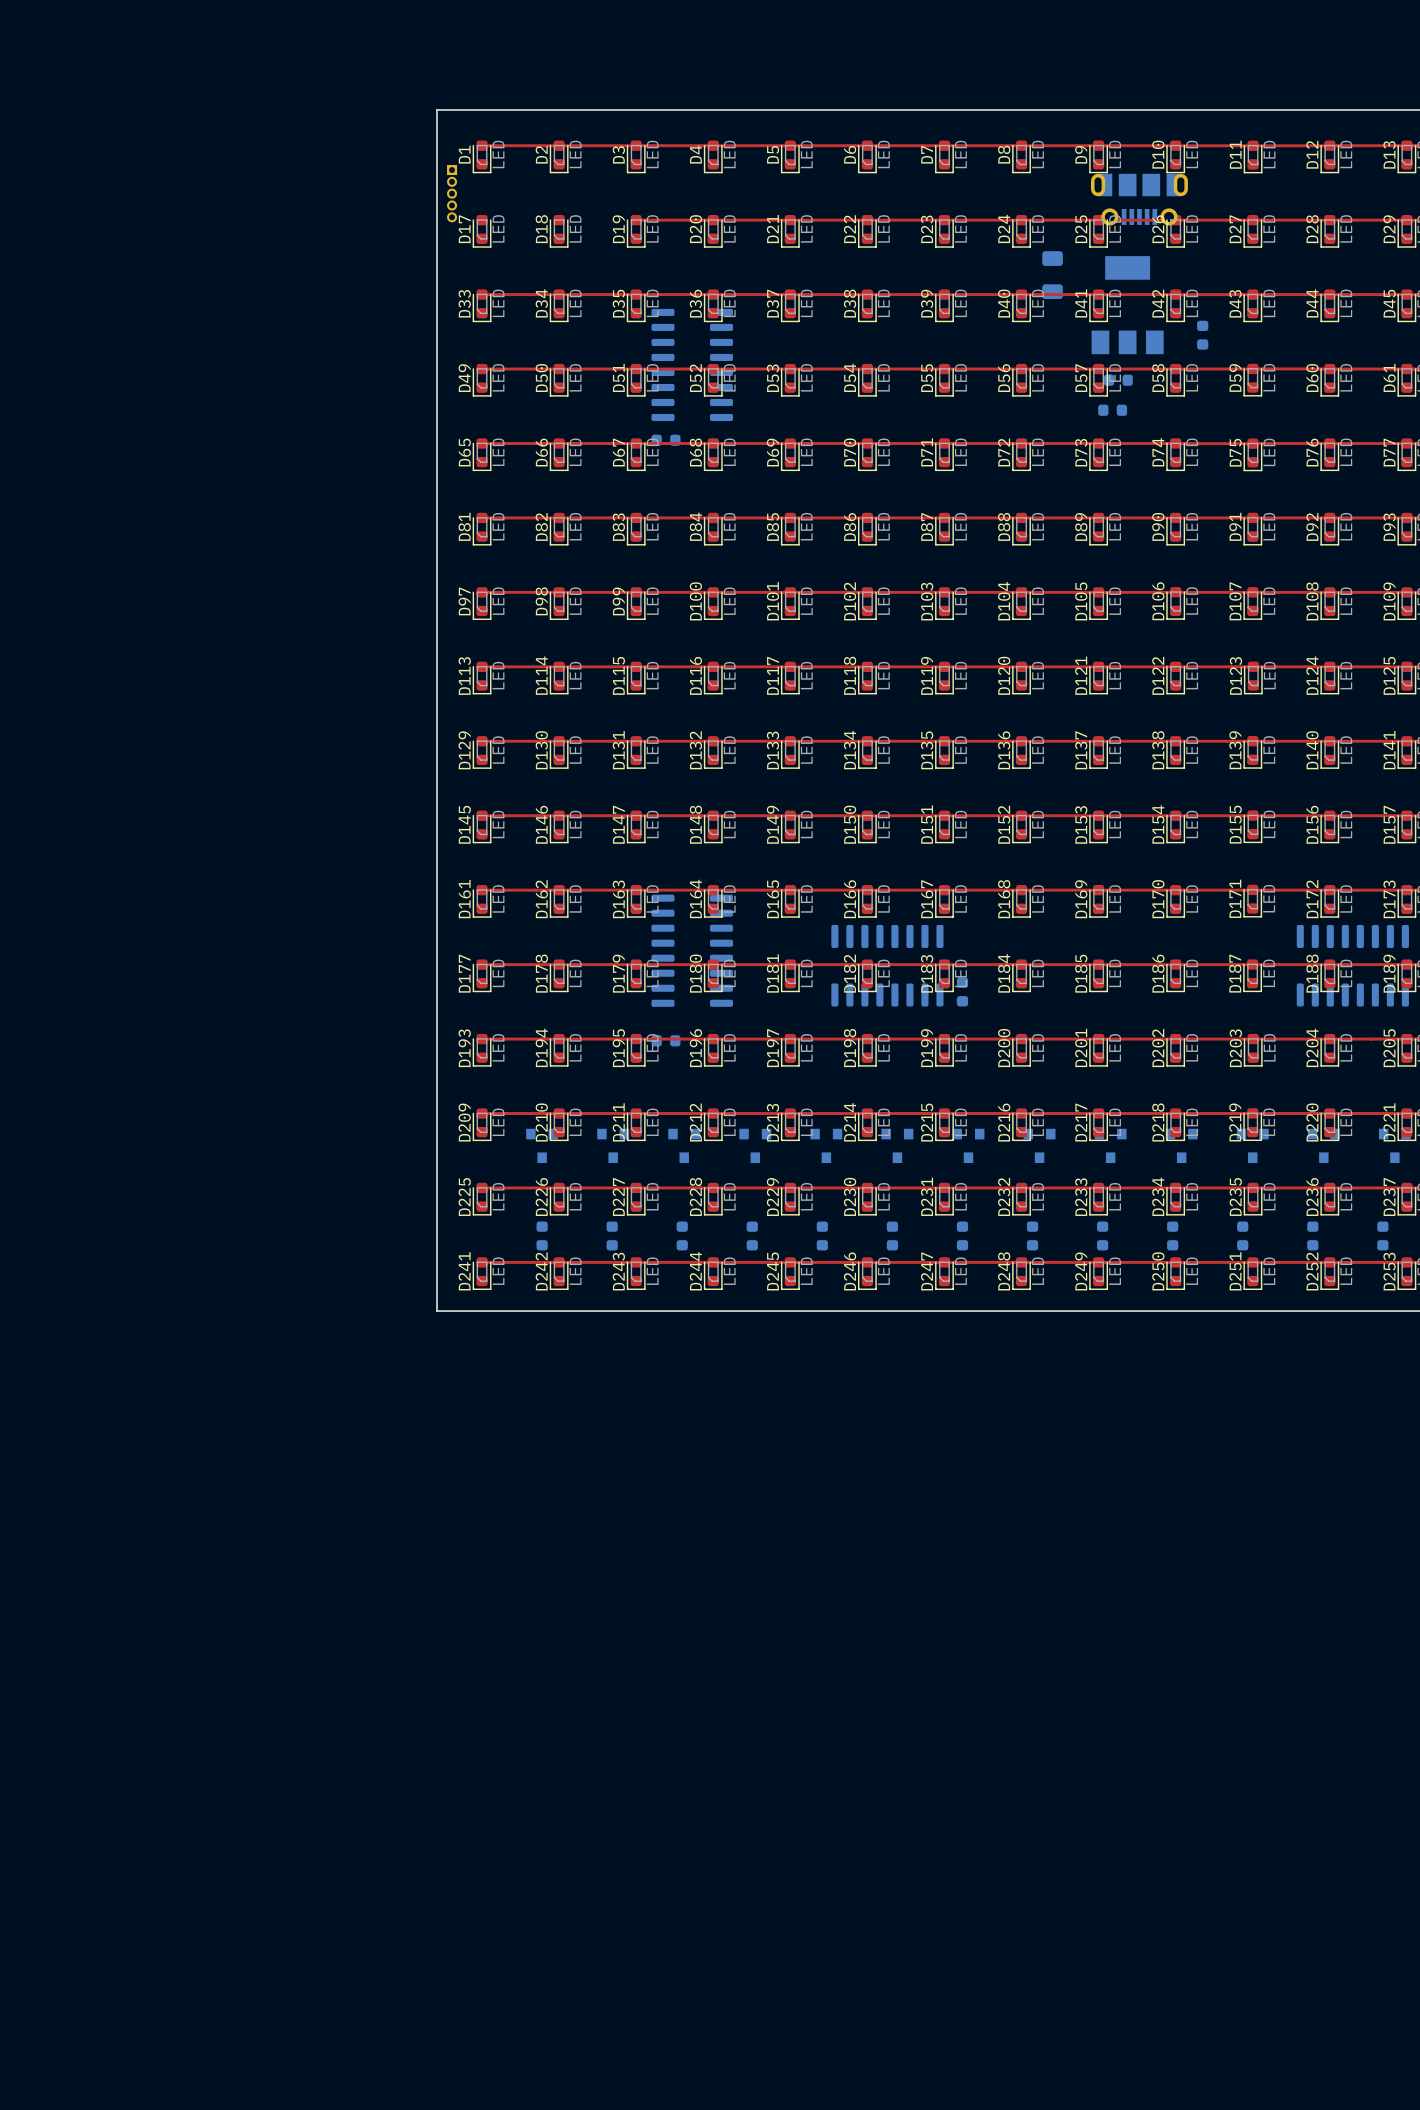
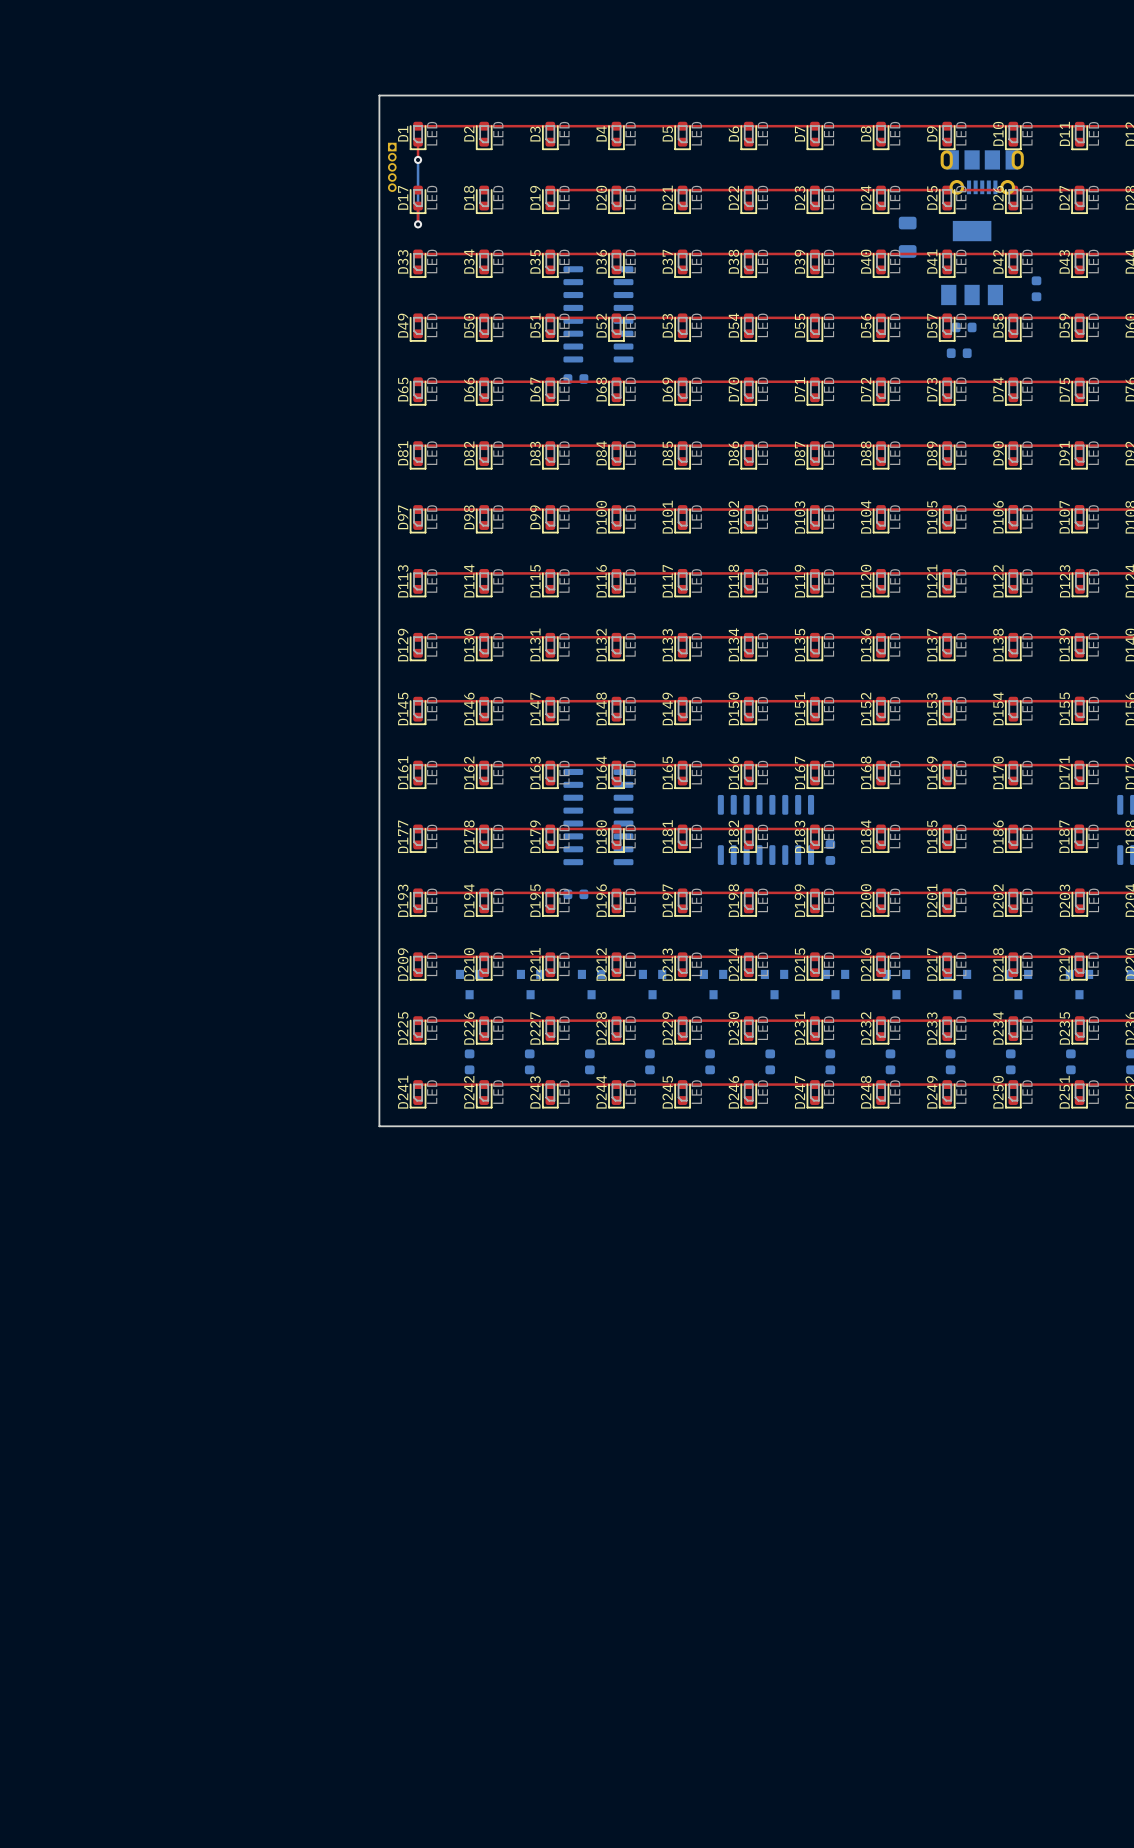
top track: none -> (418, 142) (418, 159)
bottom track: none -> (418, 159) (418, 224)
via: none -> (418, 159)
top track: none -> (418, 206) (418, 224)
via: none -> (418, 224)

